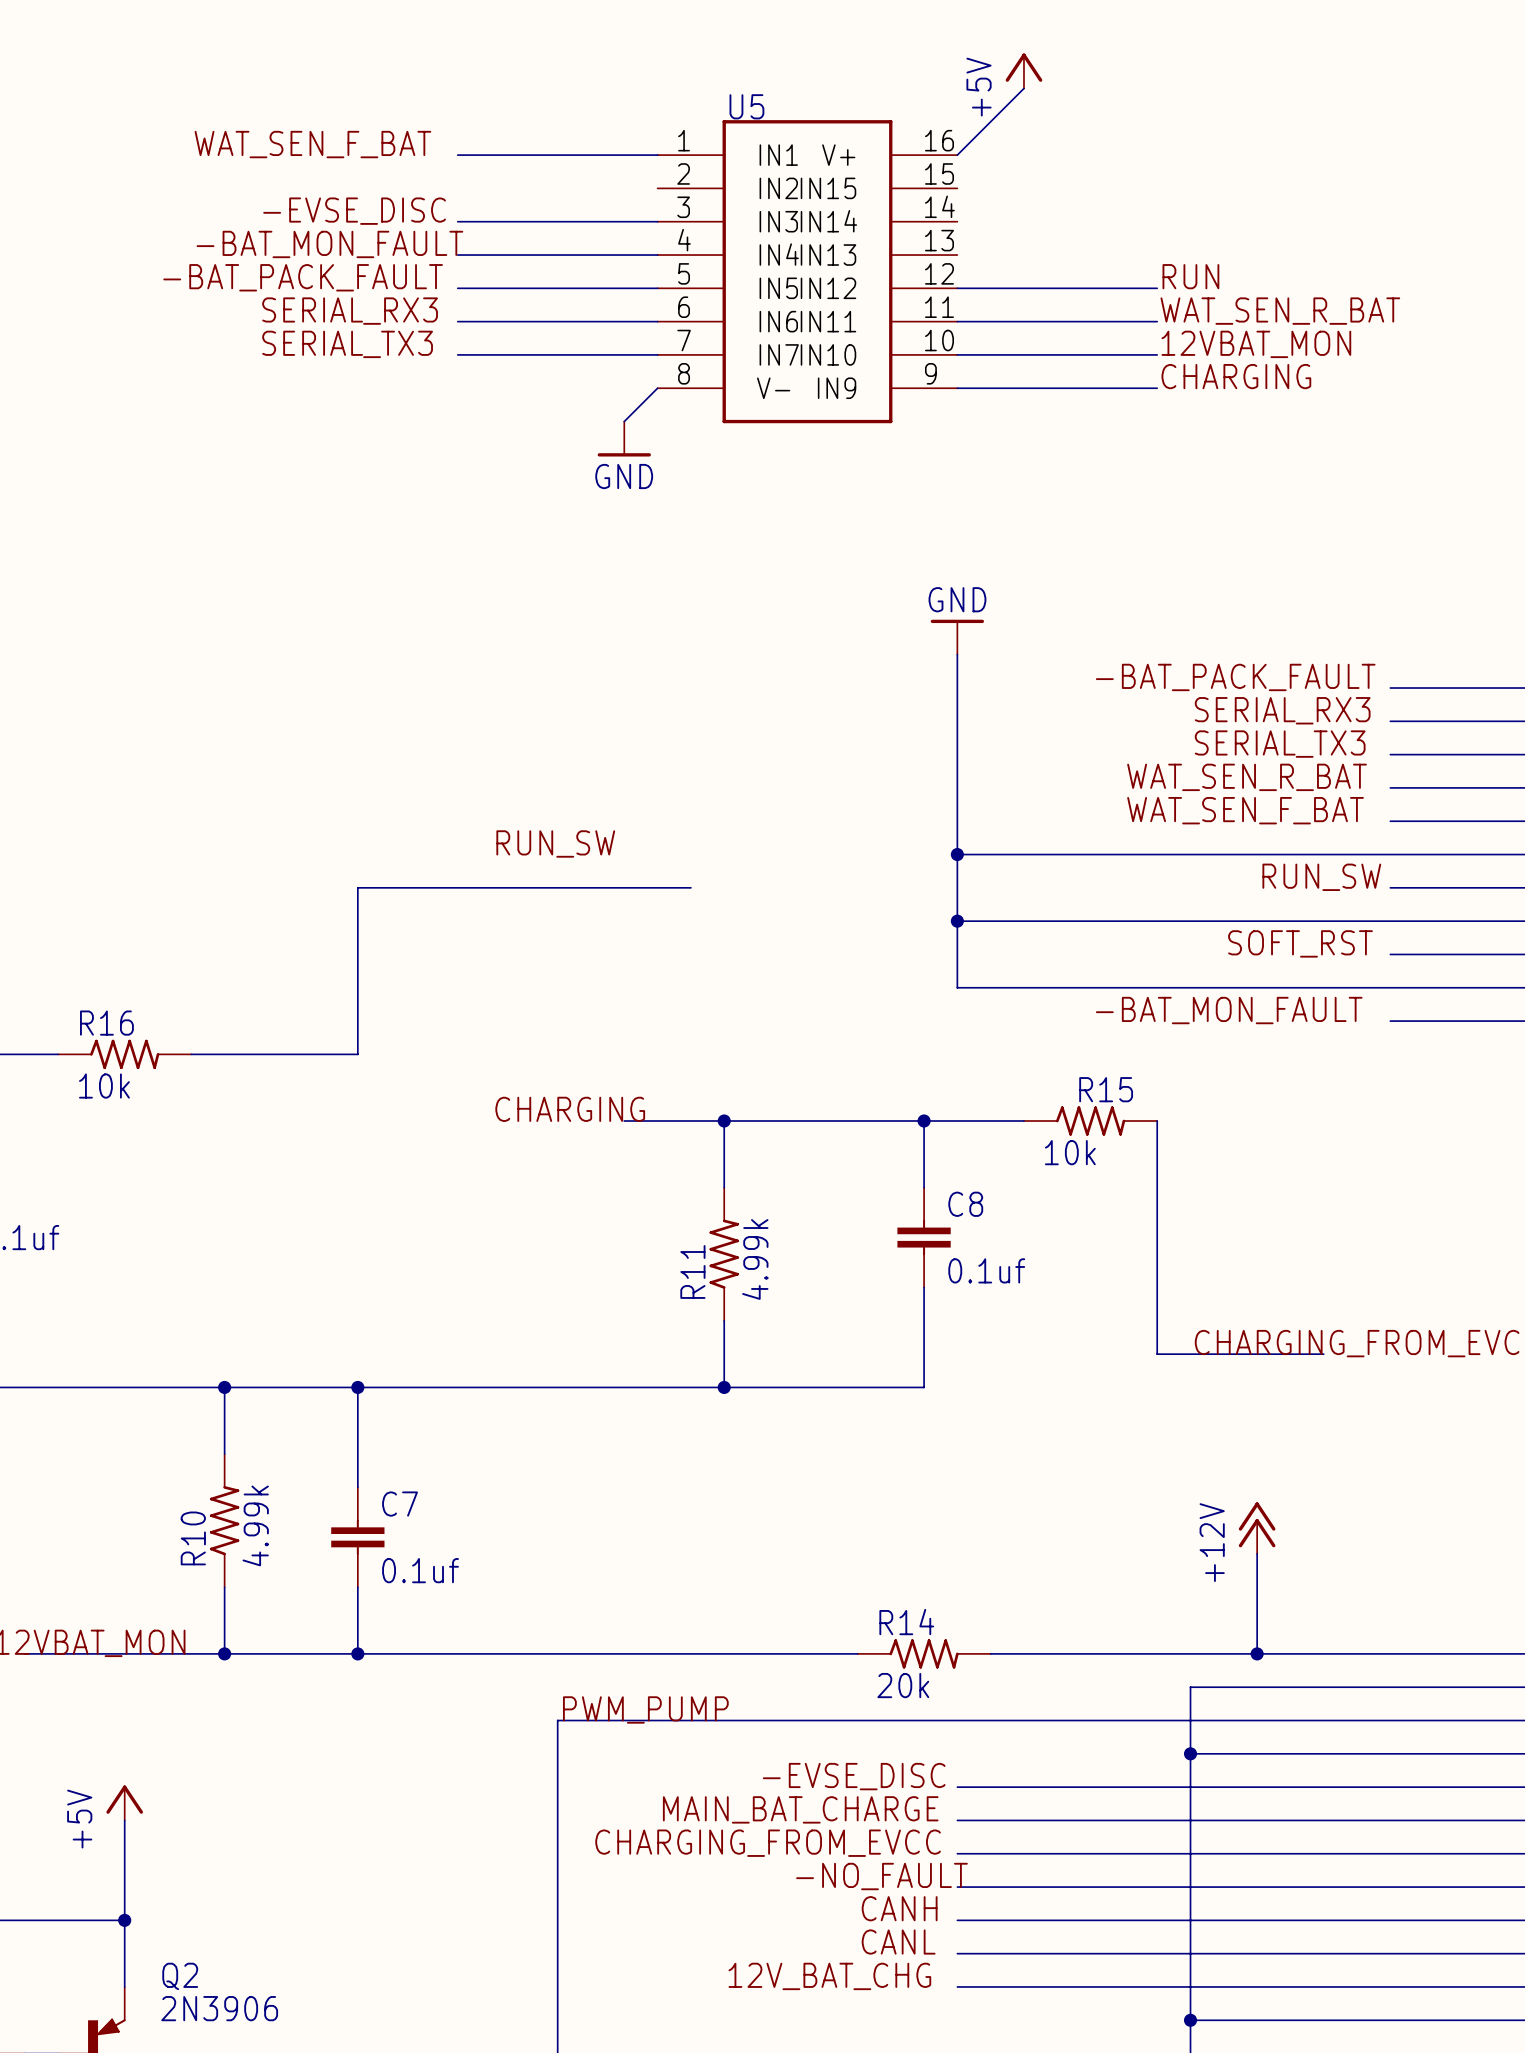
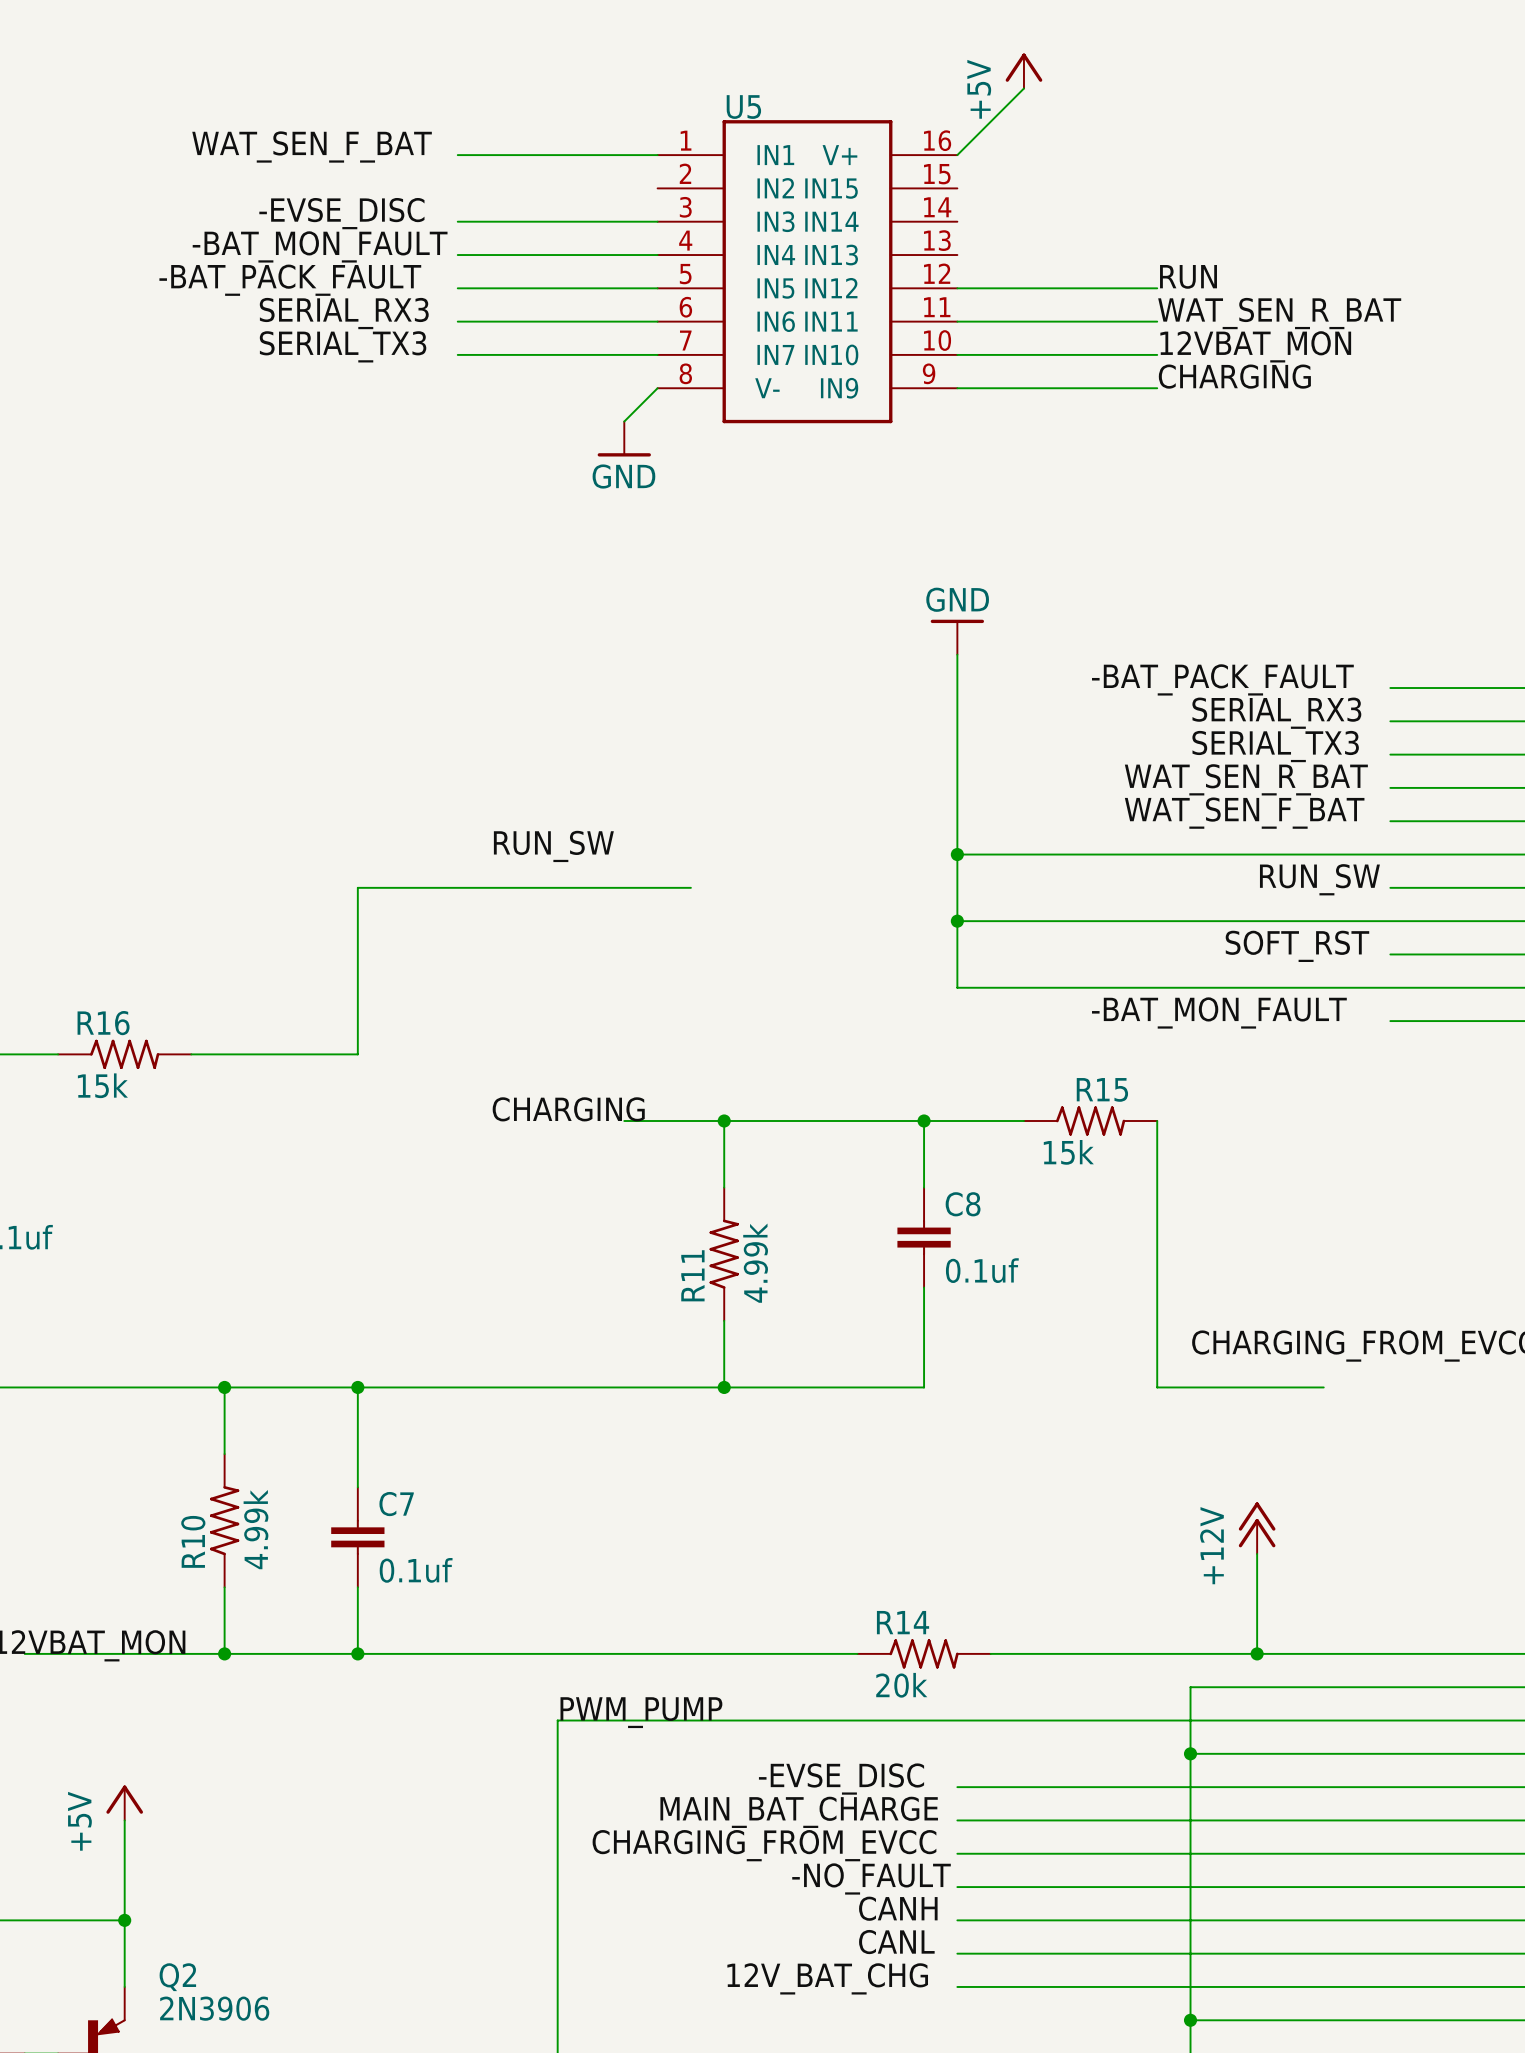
R16 value: 10k (104, 1086) -> 15k (102, 1085)
R15 value: 10k (1070, 1152) -> 15k (1068, 1152)
wire: (1157, 1354) (1323, 1354) -> (1157, 1354) (1157, 1387) (1323, 1387)

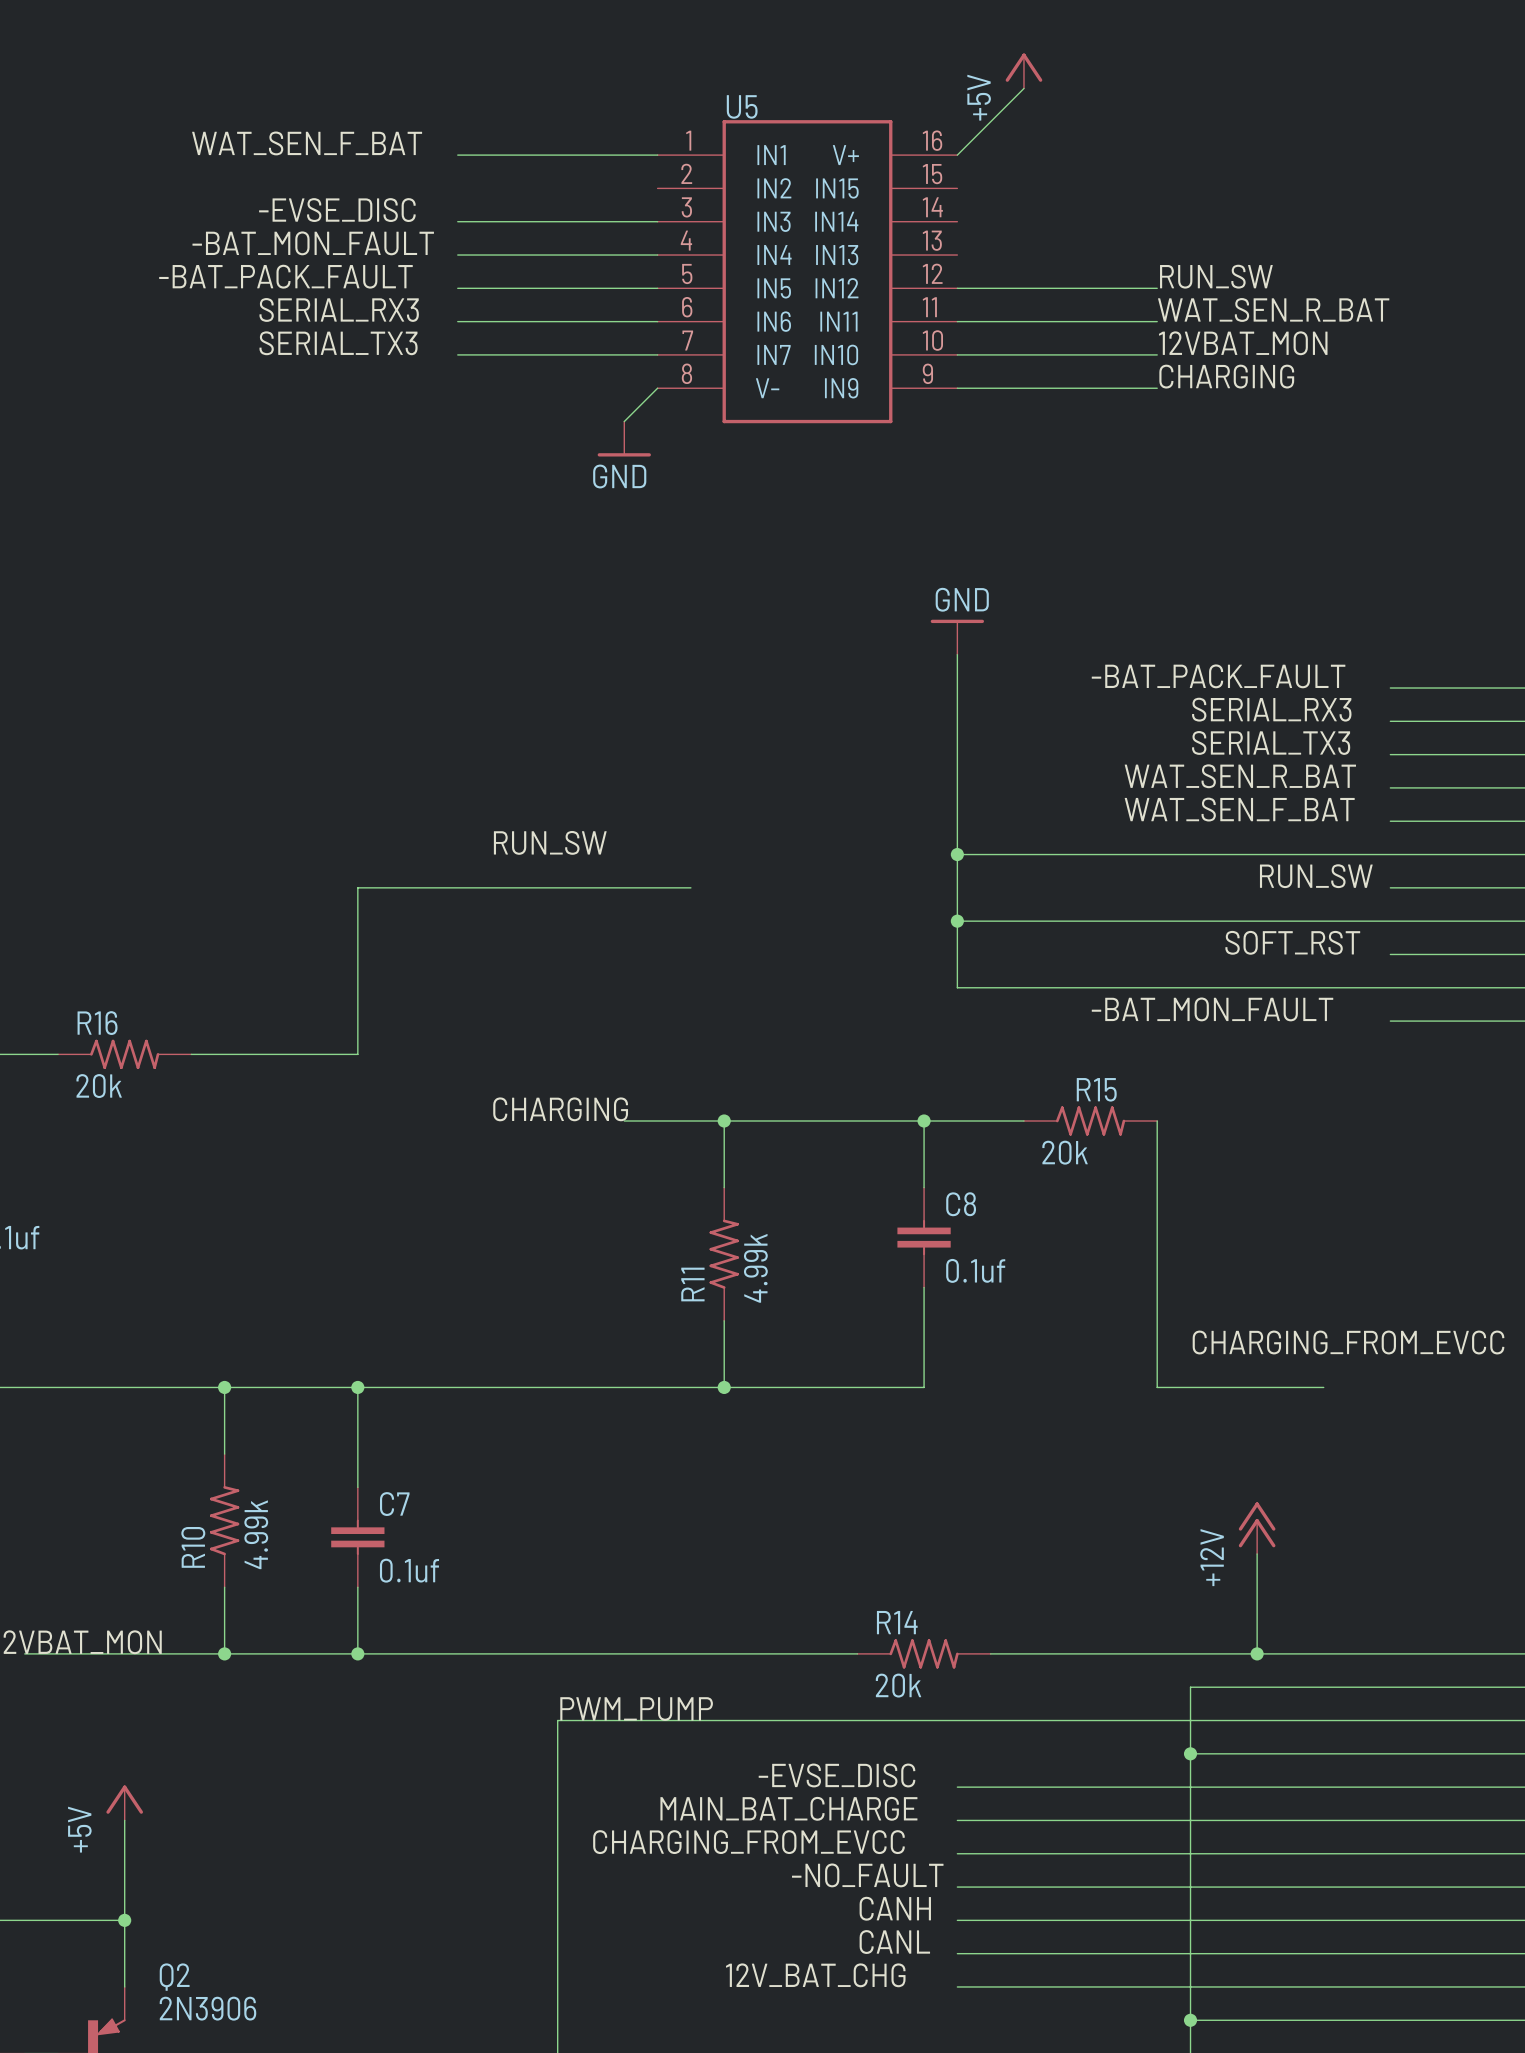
label: RUN (1188, 276) -> RUN_SW (1216, 276)
R16 value: 15k (102, 1085) -> 20k (99, 1086)
R15 value: 15k (1068, 1152) -> 20k (1065, 1152)

